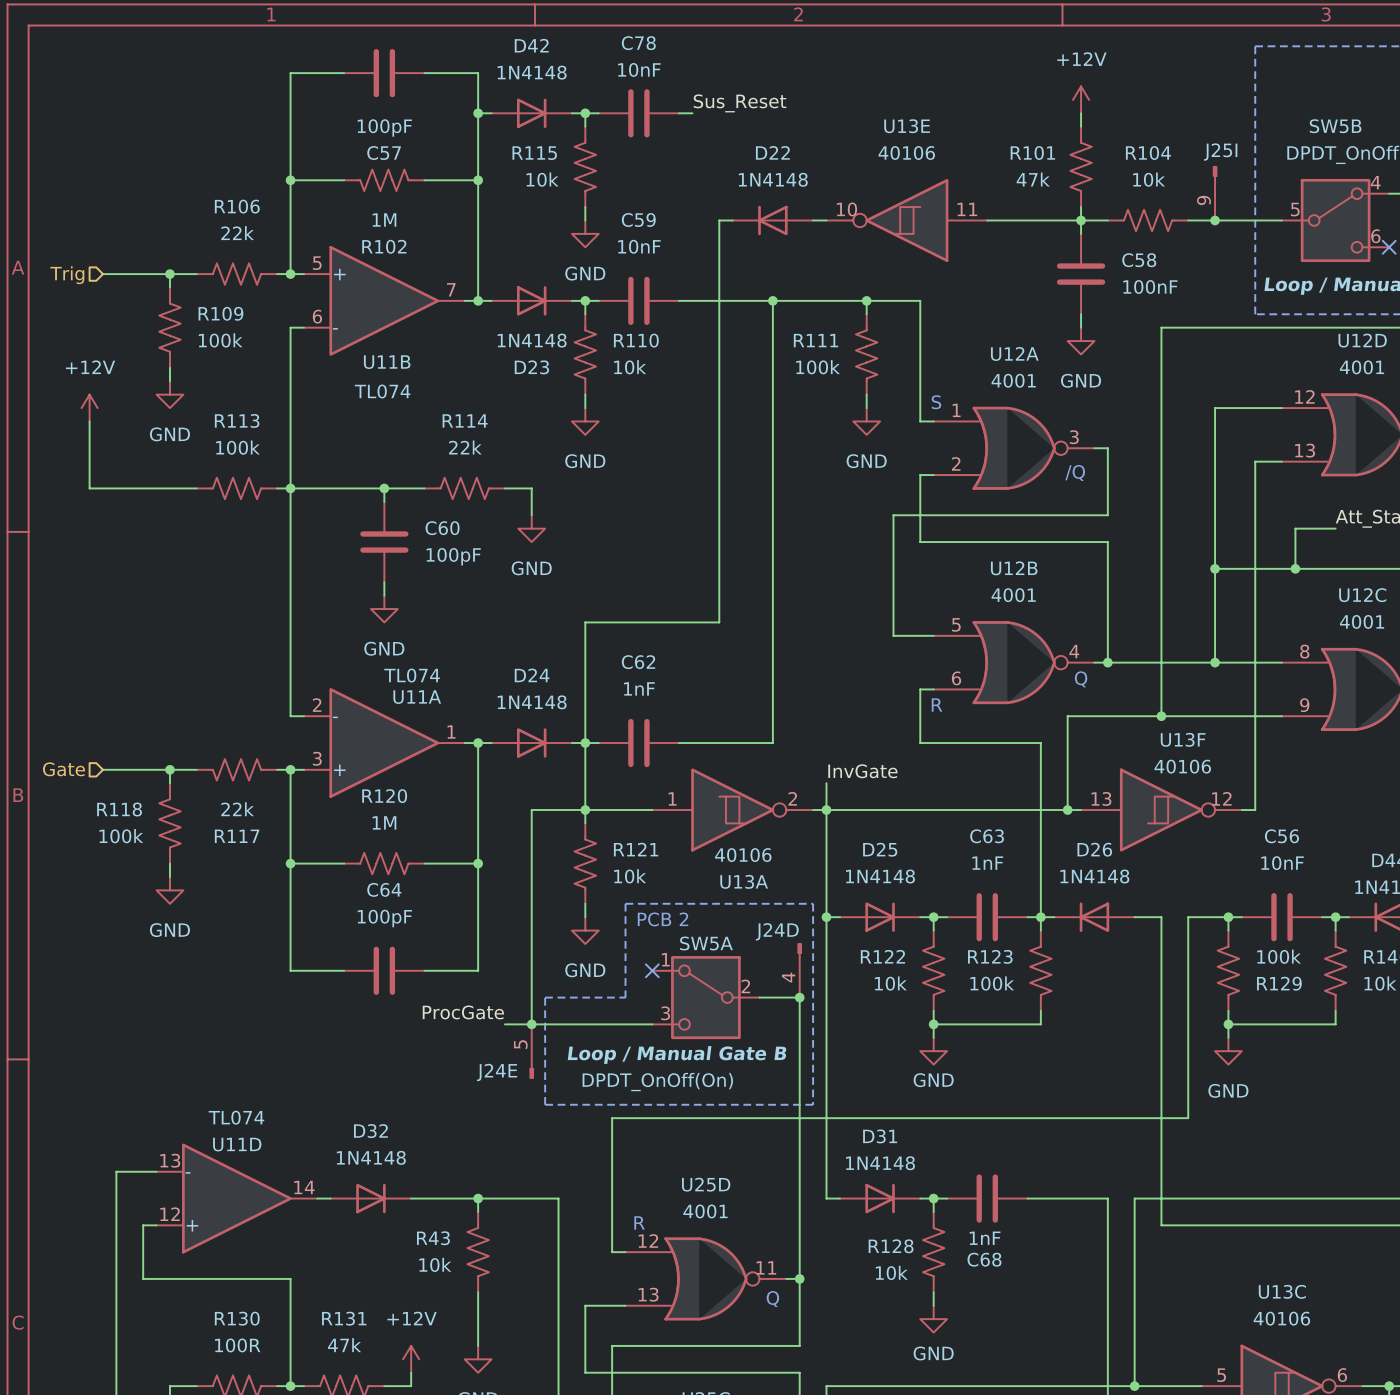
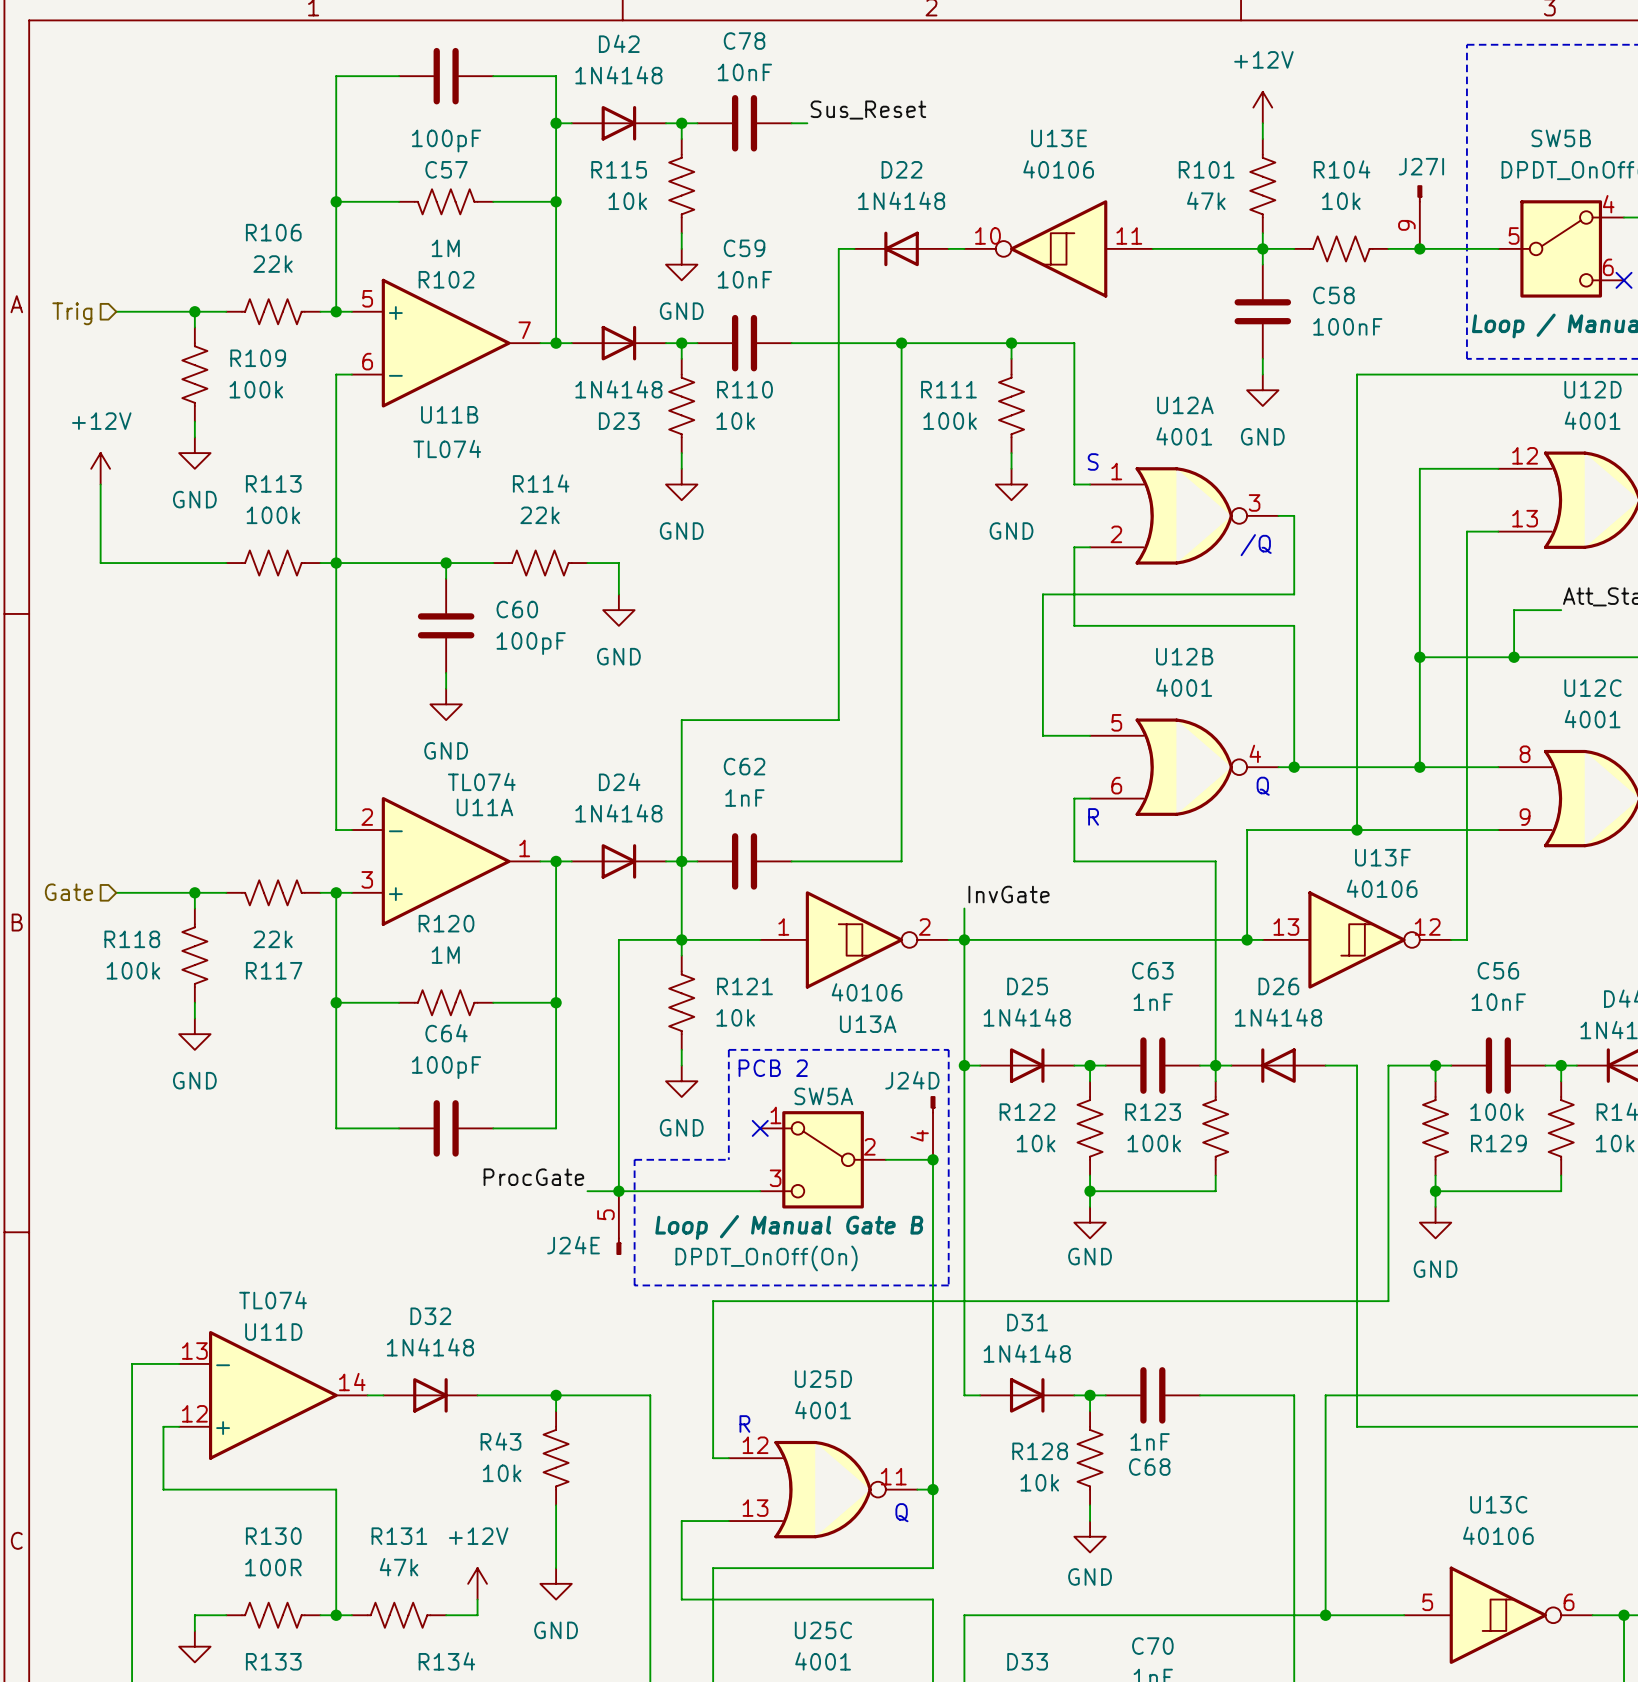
J25I name: J25I (1220, 152) -> J27I (1421, 166)

